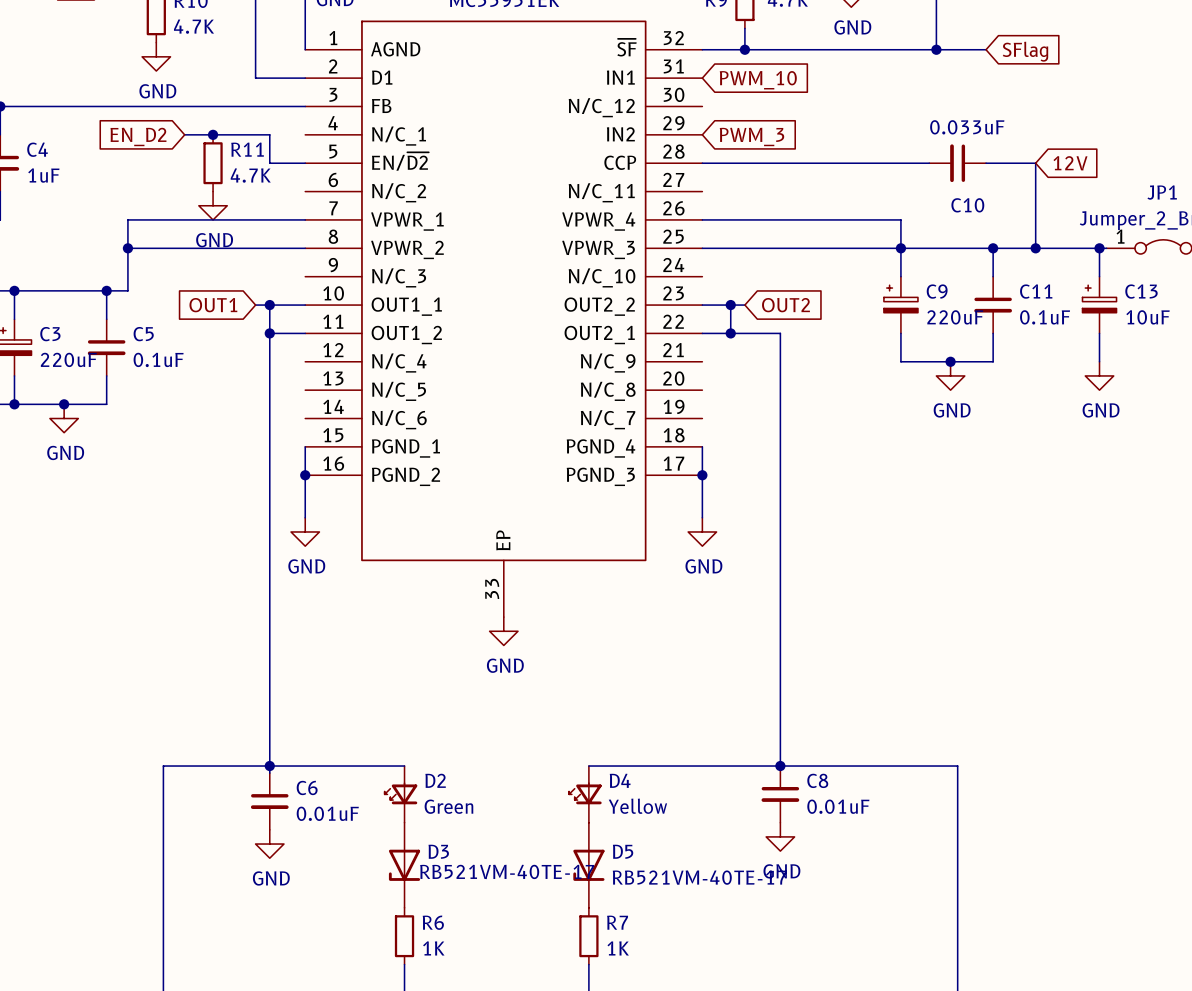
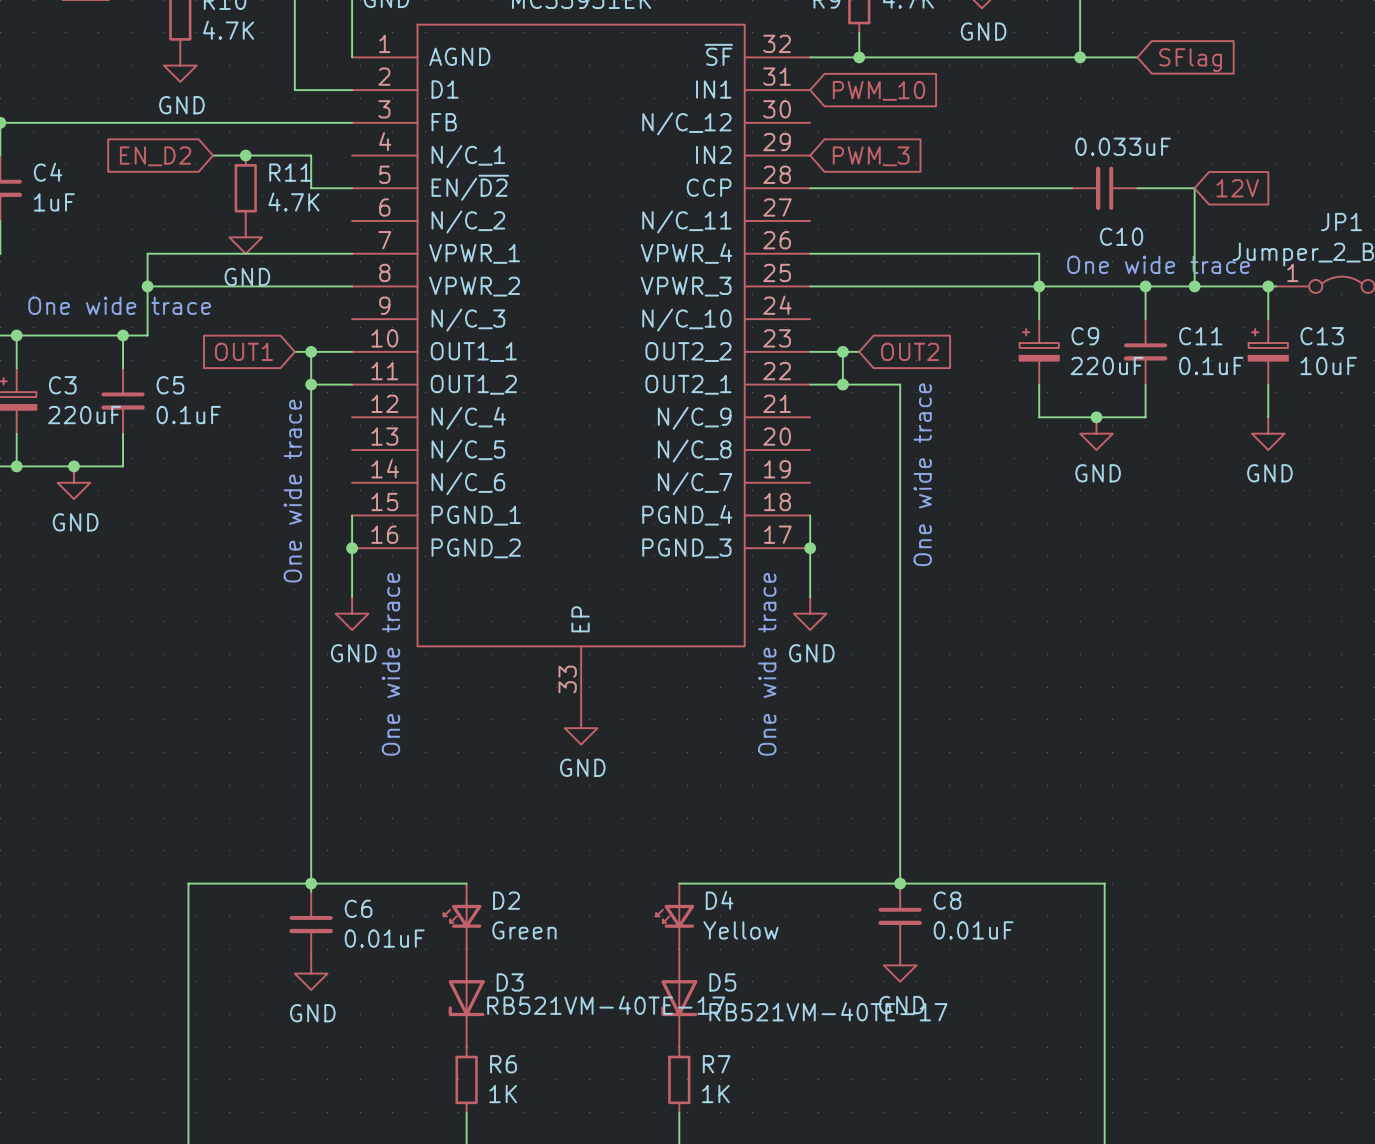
text: none -> One wide trace (1158, 264)
text: none -> One wide trace (119, 305)
text: none -> One wide trace (922, 474)
text: none -> One wide trace (292, 491)
text: none -> One wide trace (390, 664)
text: none -> One wide trace (767, 664)

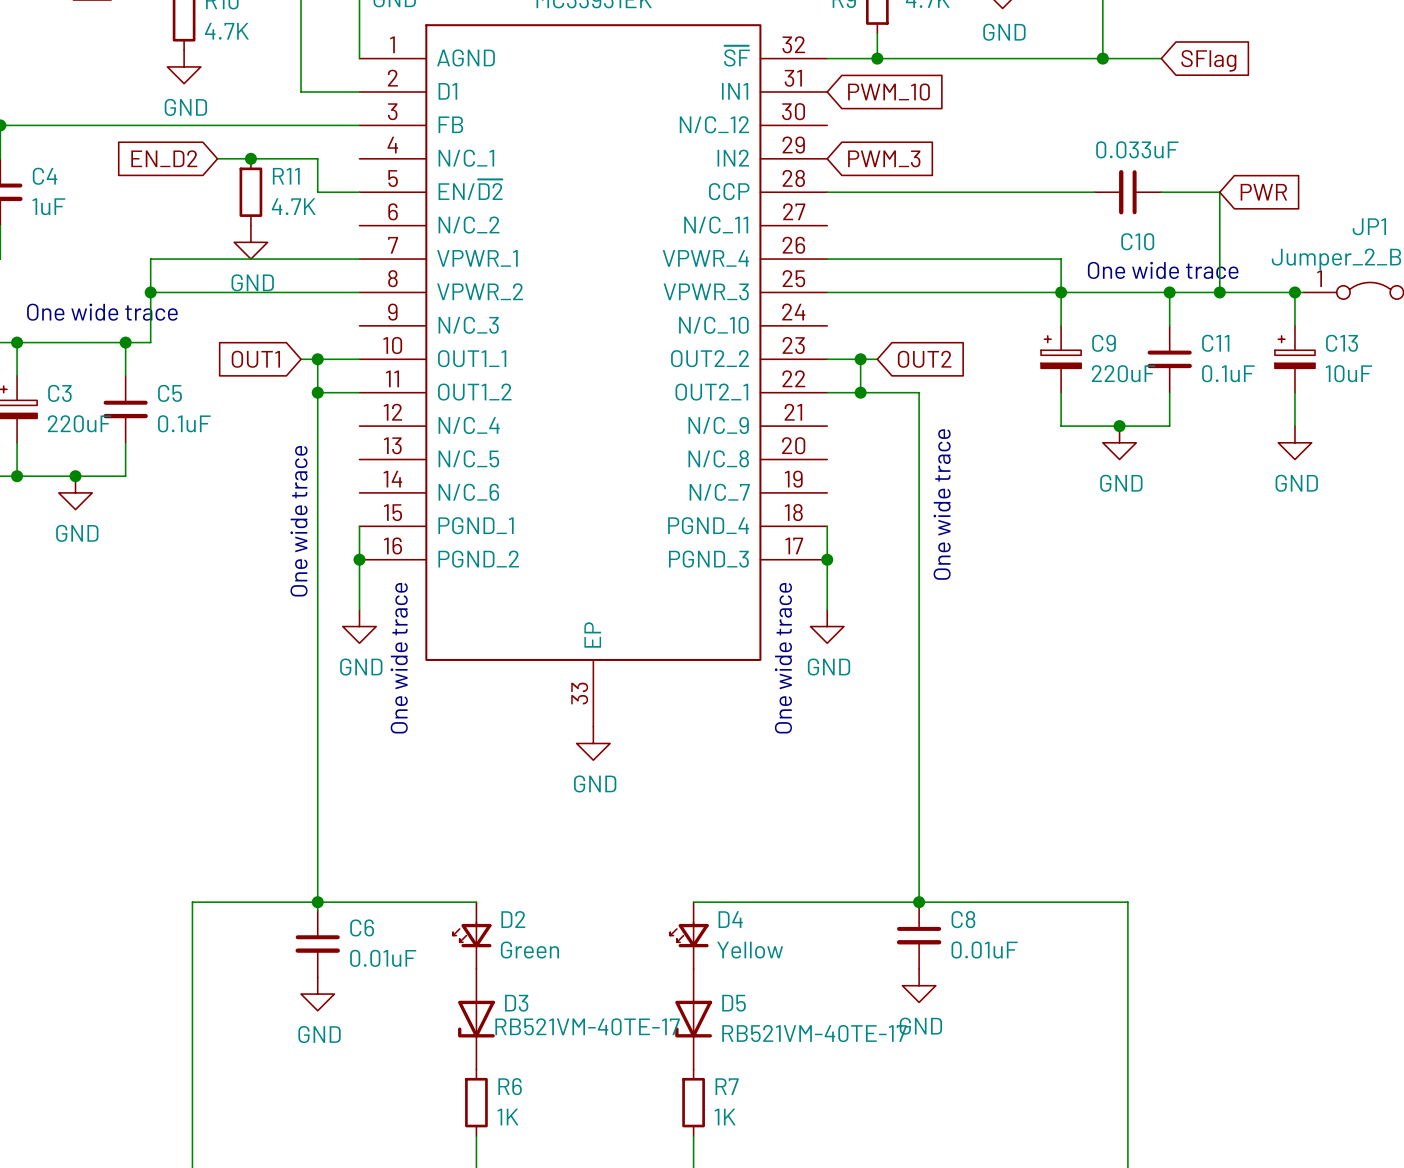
global label: 12V (1237, 188) -> PWR (1263, 192)

